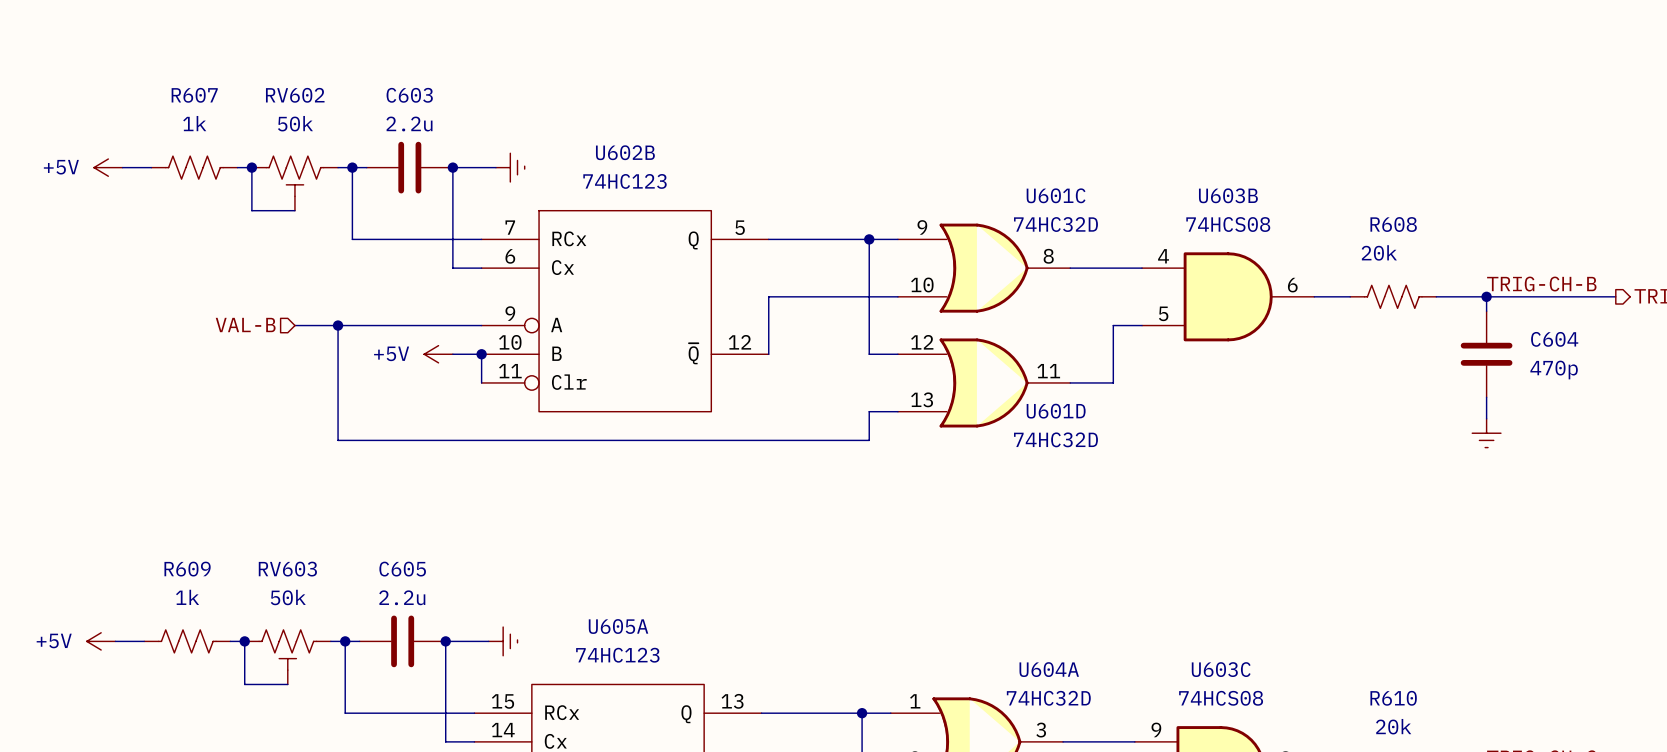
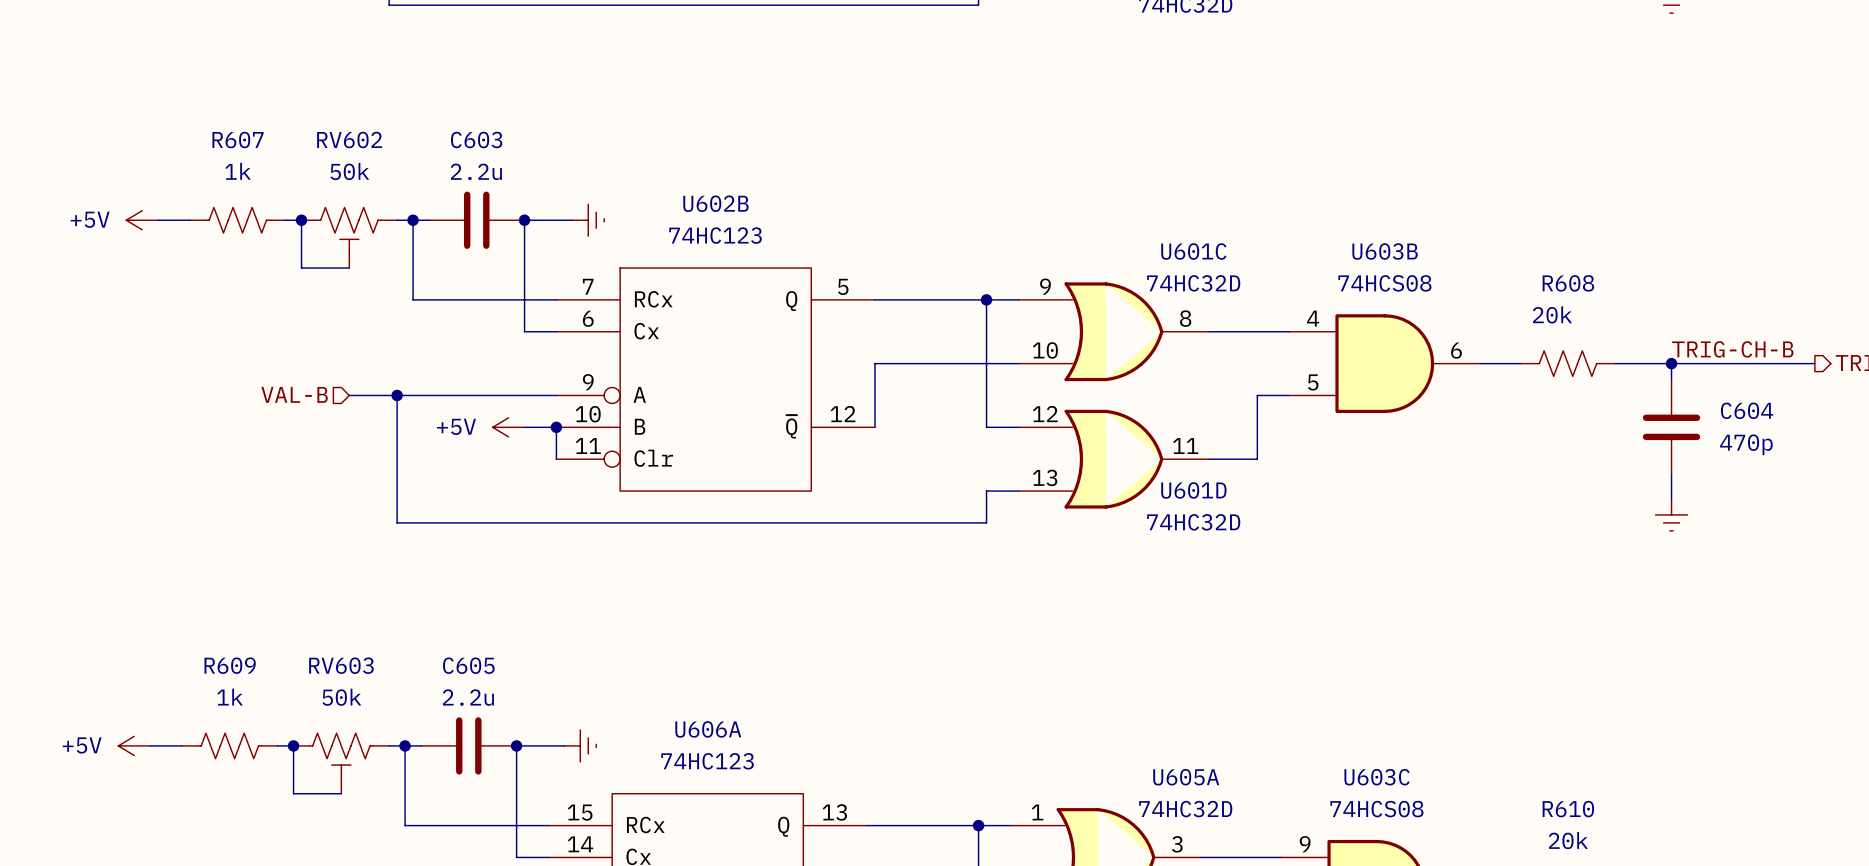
U605A name: U605A (618, 626) -> U606A (708, 729)
U604A name: U604A (1049, 669) -> U605A (1186, 777)

